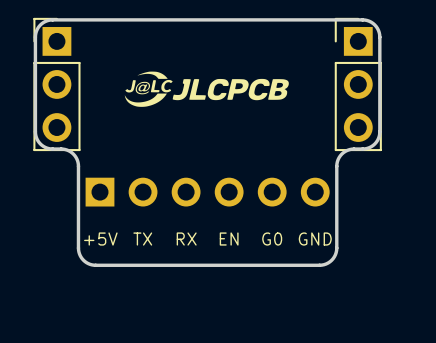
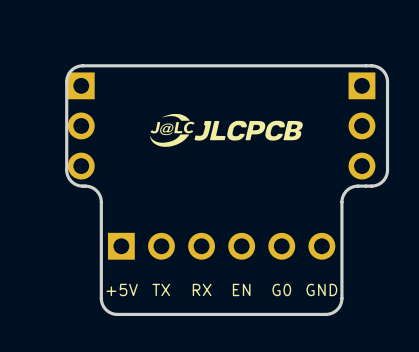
part side: top (56, 84) -> bottom (81, 125)
part side: top (358, 84) -> bottom (361, 125)
board edge: (55, 149) (68, 150) (77, 160) (78, 251) (84, 261) (95, 265) (326, 263) (333, 258) (336, 250) (337, 161) (343, 152) (354, 149) -> (85, 186) (96, 190) (101, 200) (101, 302) (107, 311) (117, 314) (325, 314) (333, 312) (339, 306) (341, 300) (342, 198) (349, 188) (363, 186)
part position: (207, 192) -> (221, 246)
text position: +5V (100, 239) -> +5V (122, 289)
text position: TX (142, 239) -> TX (161, 289)
text position: RX (186, 239) -> RX (202, 289)
text position: EN (229, 239) -> EN (241, 289)
text position: G0 (272, 239) -> G0 (281, 289)
text position: GND (315, 239) -> GND (321, 289)

